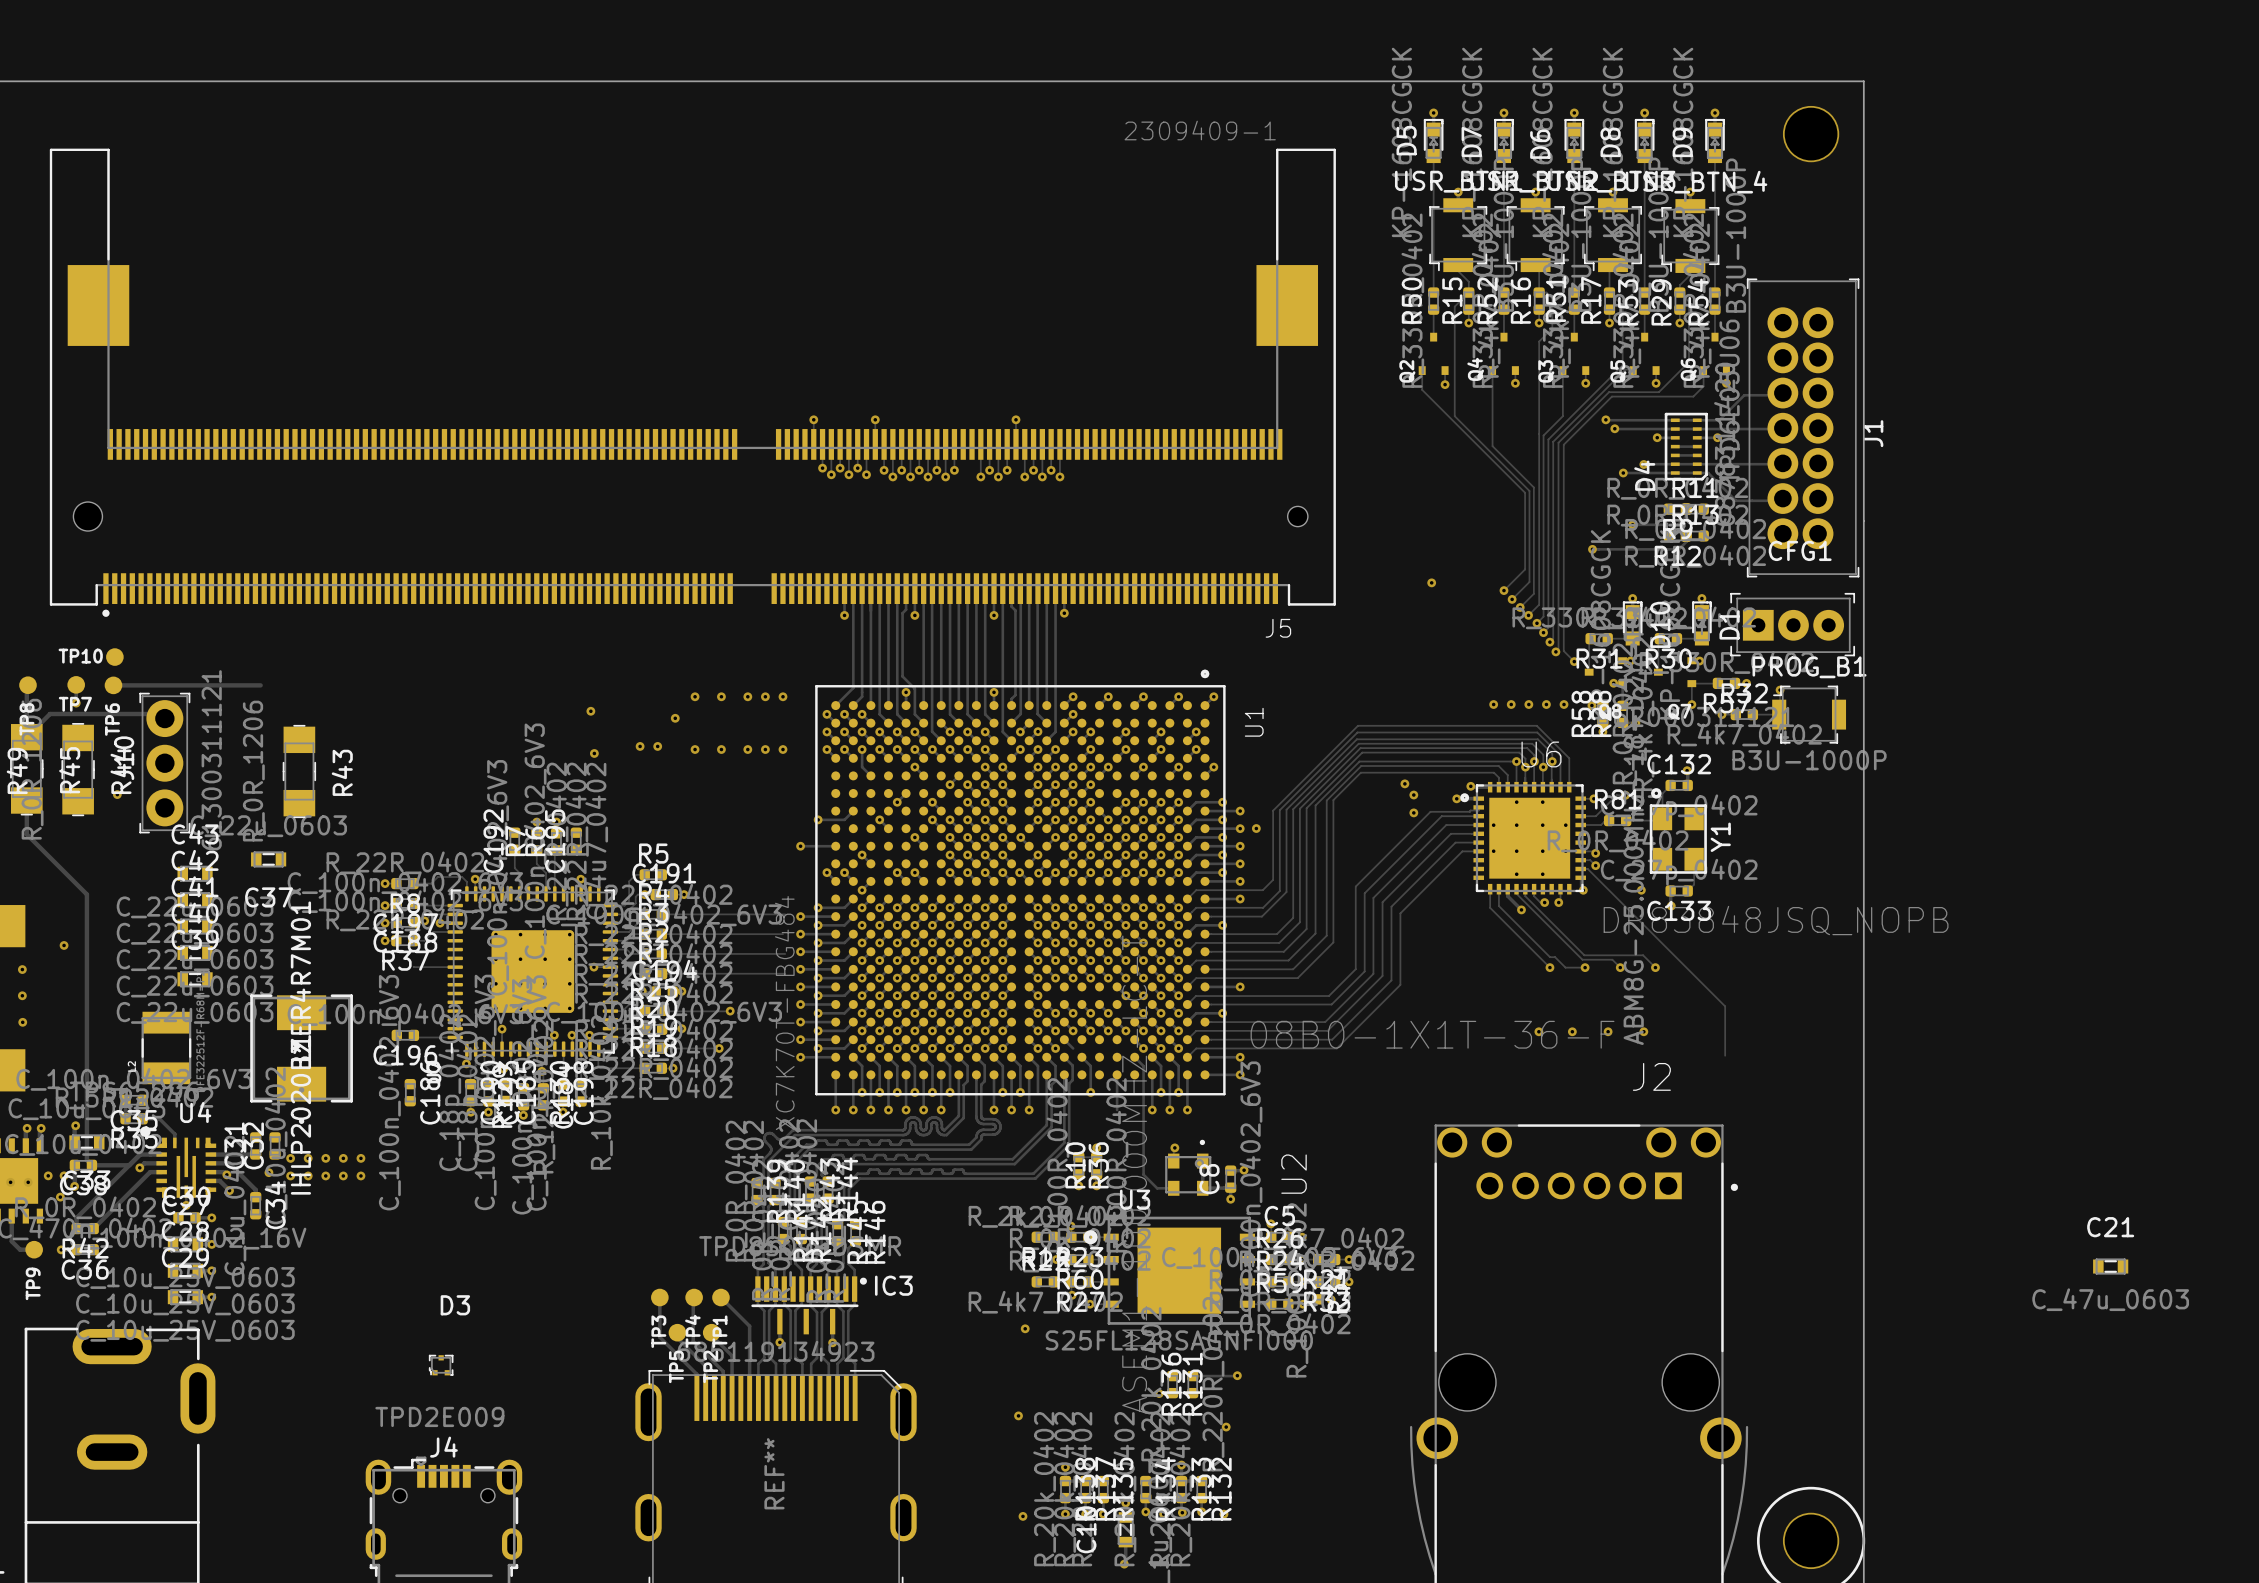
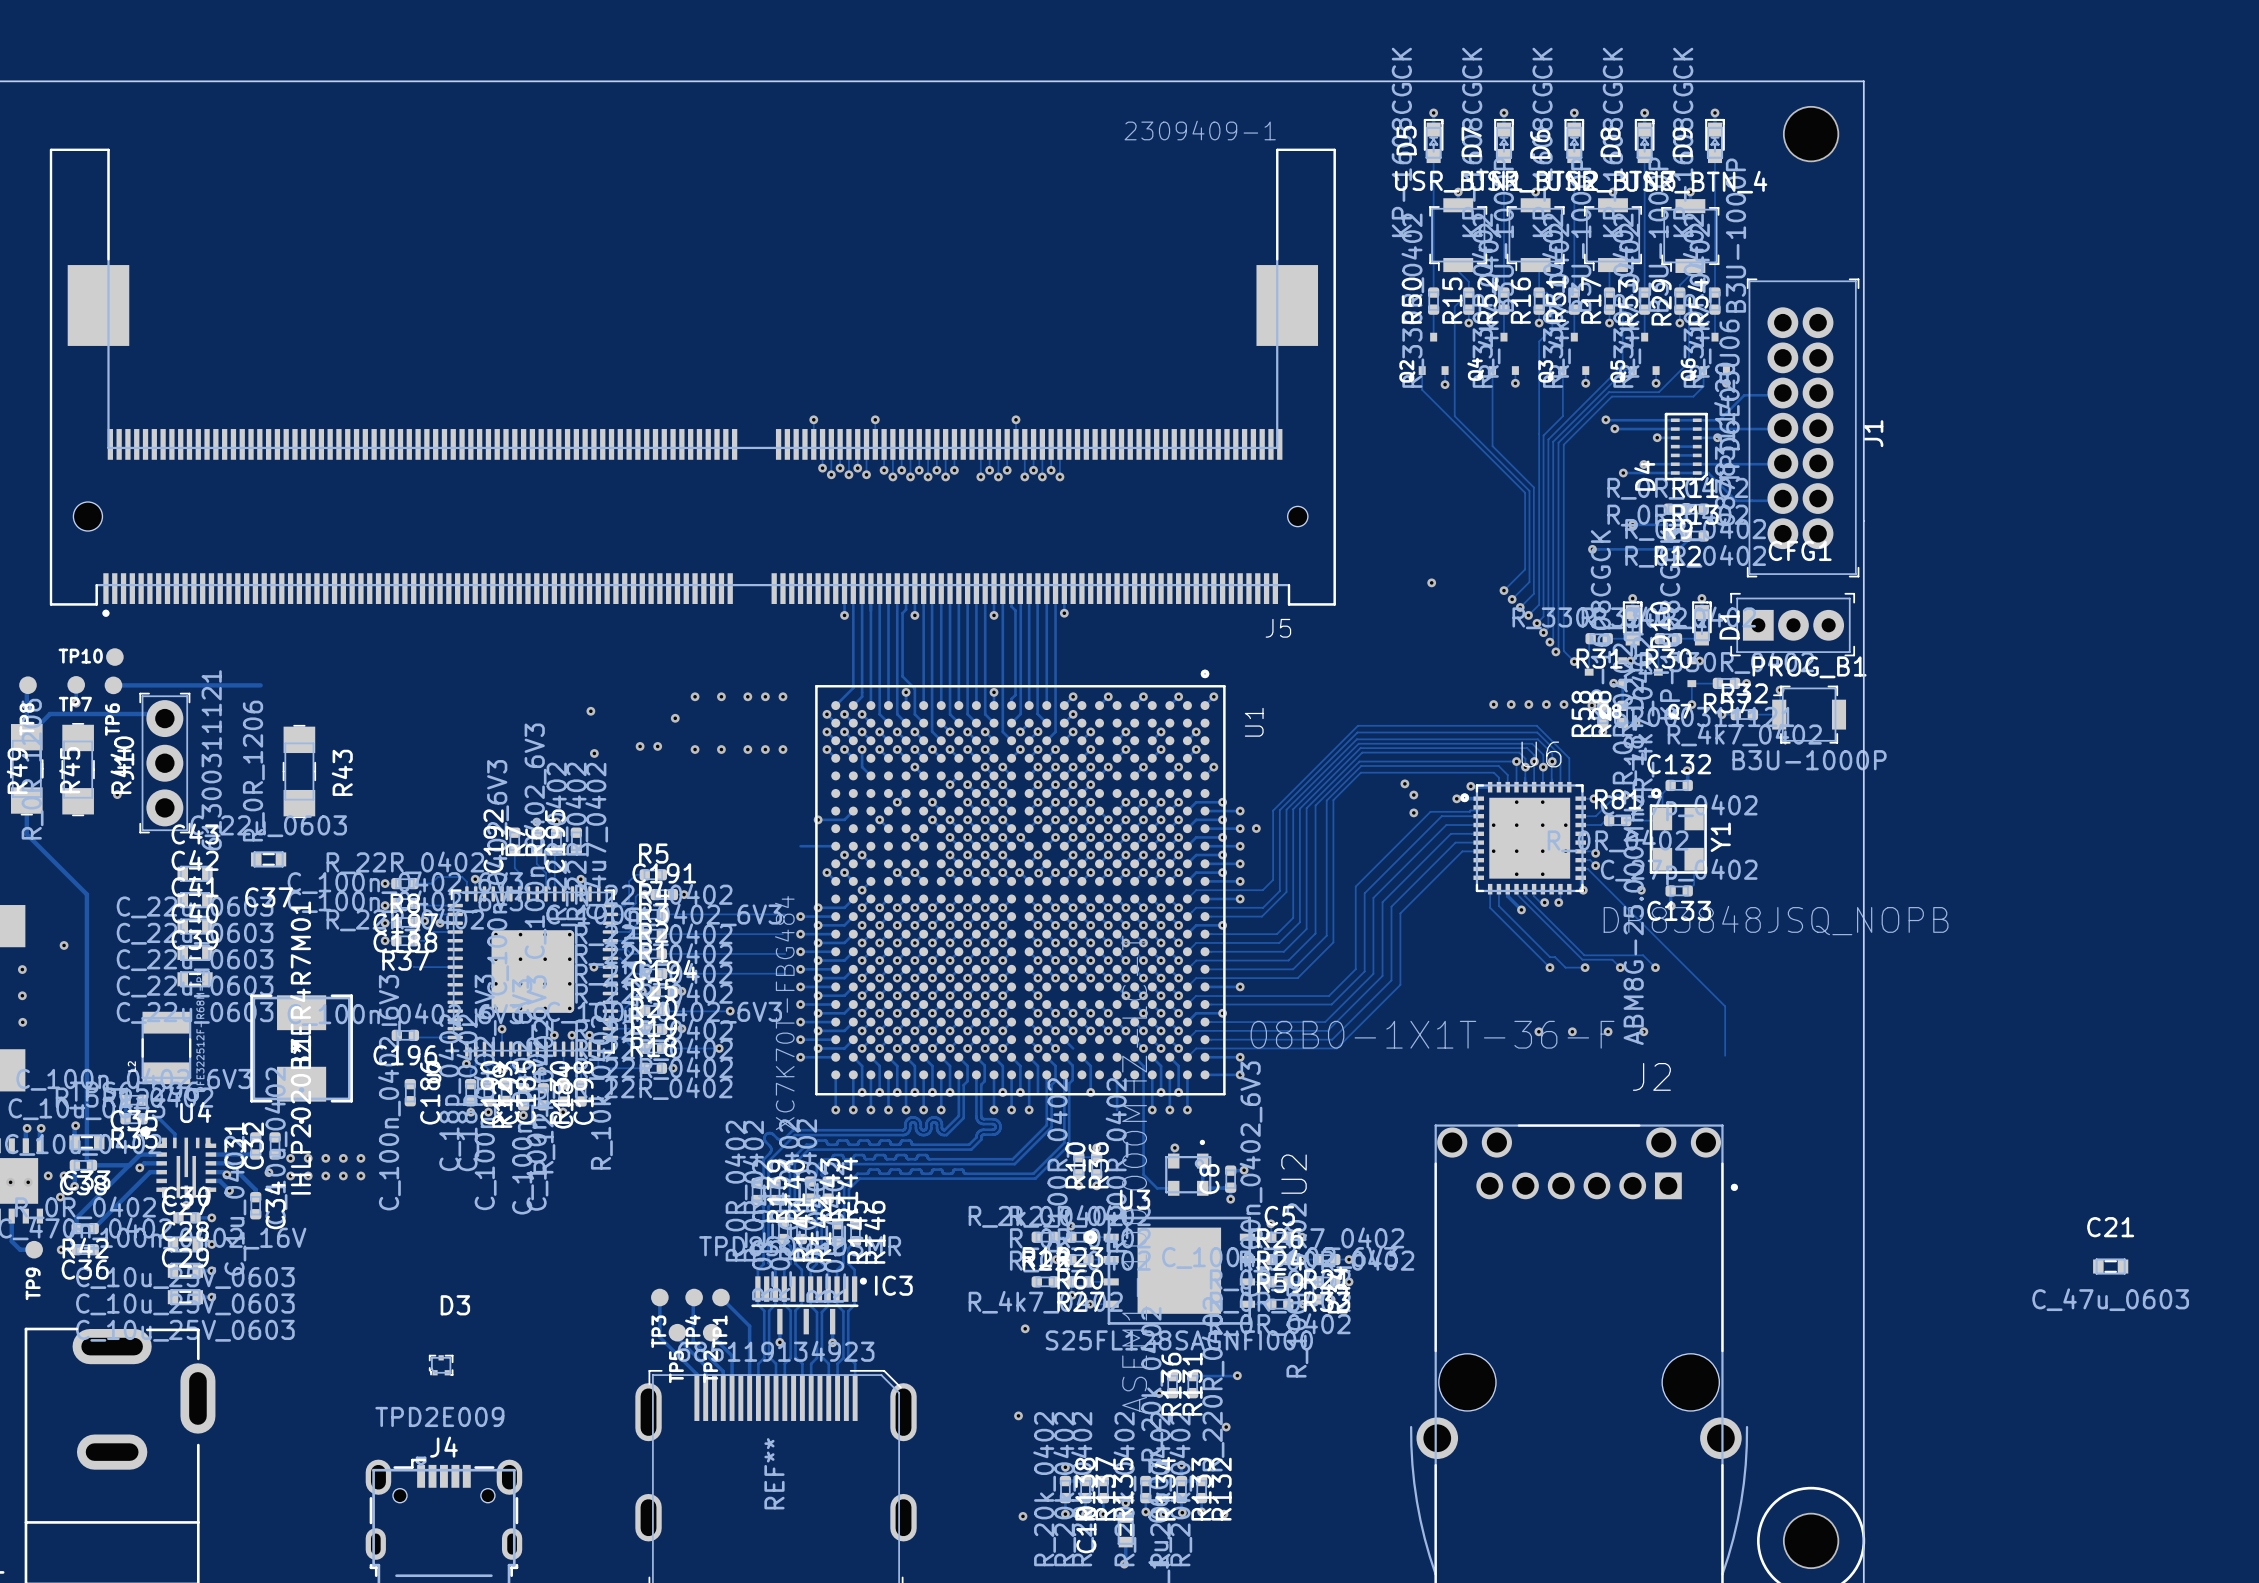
via position: (800, 846) -> (844, 855)

